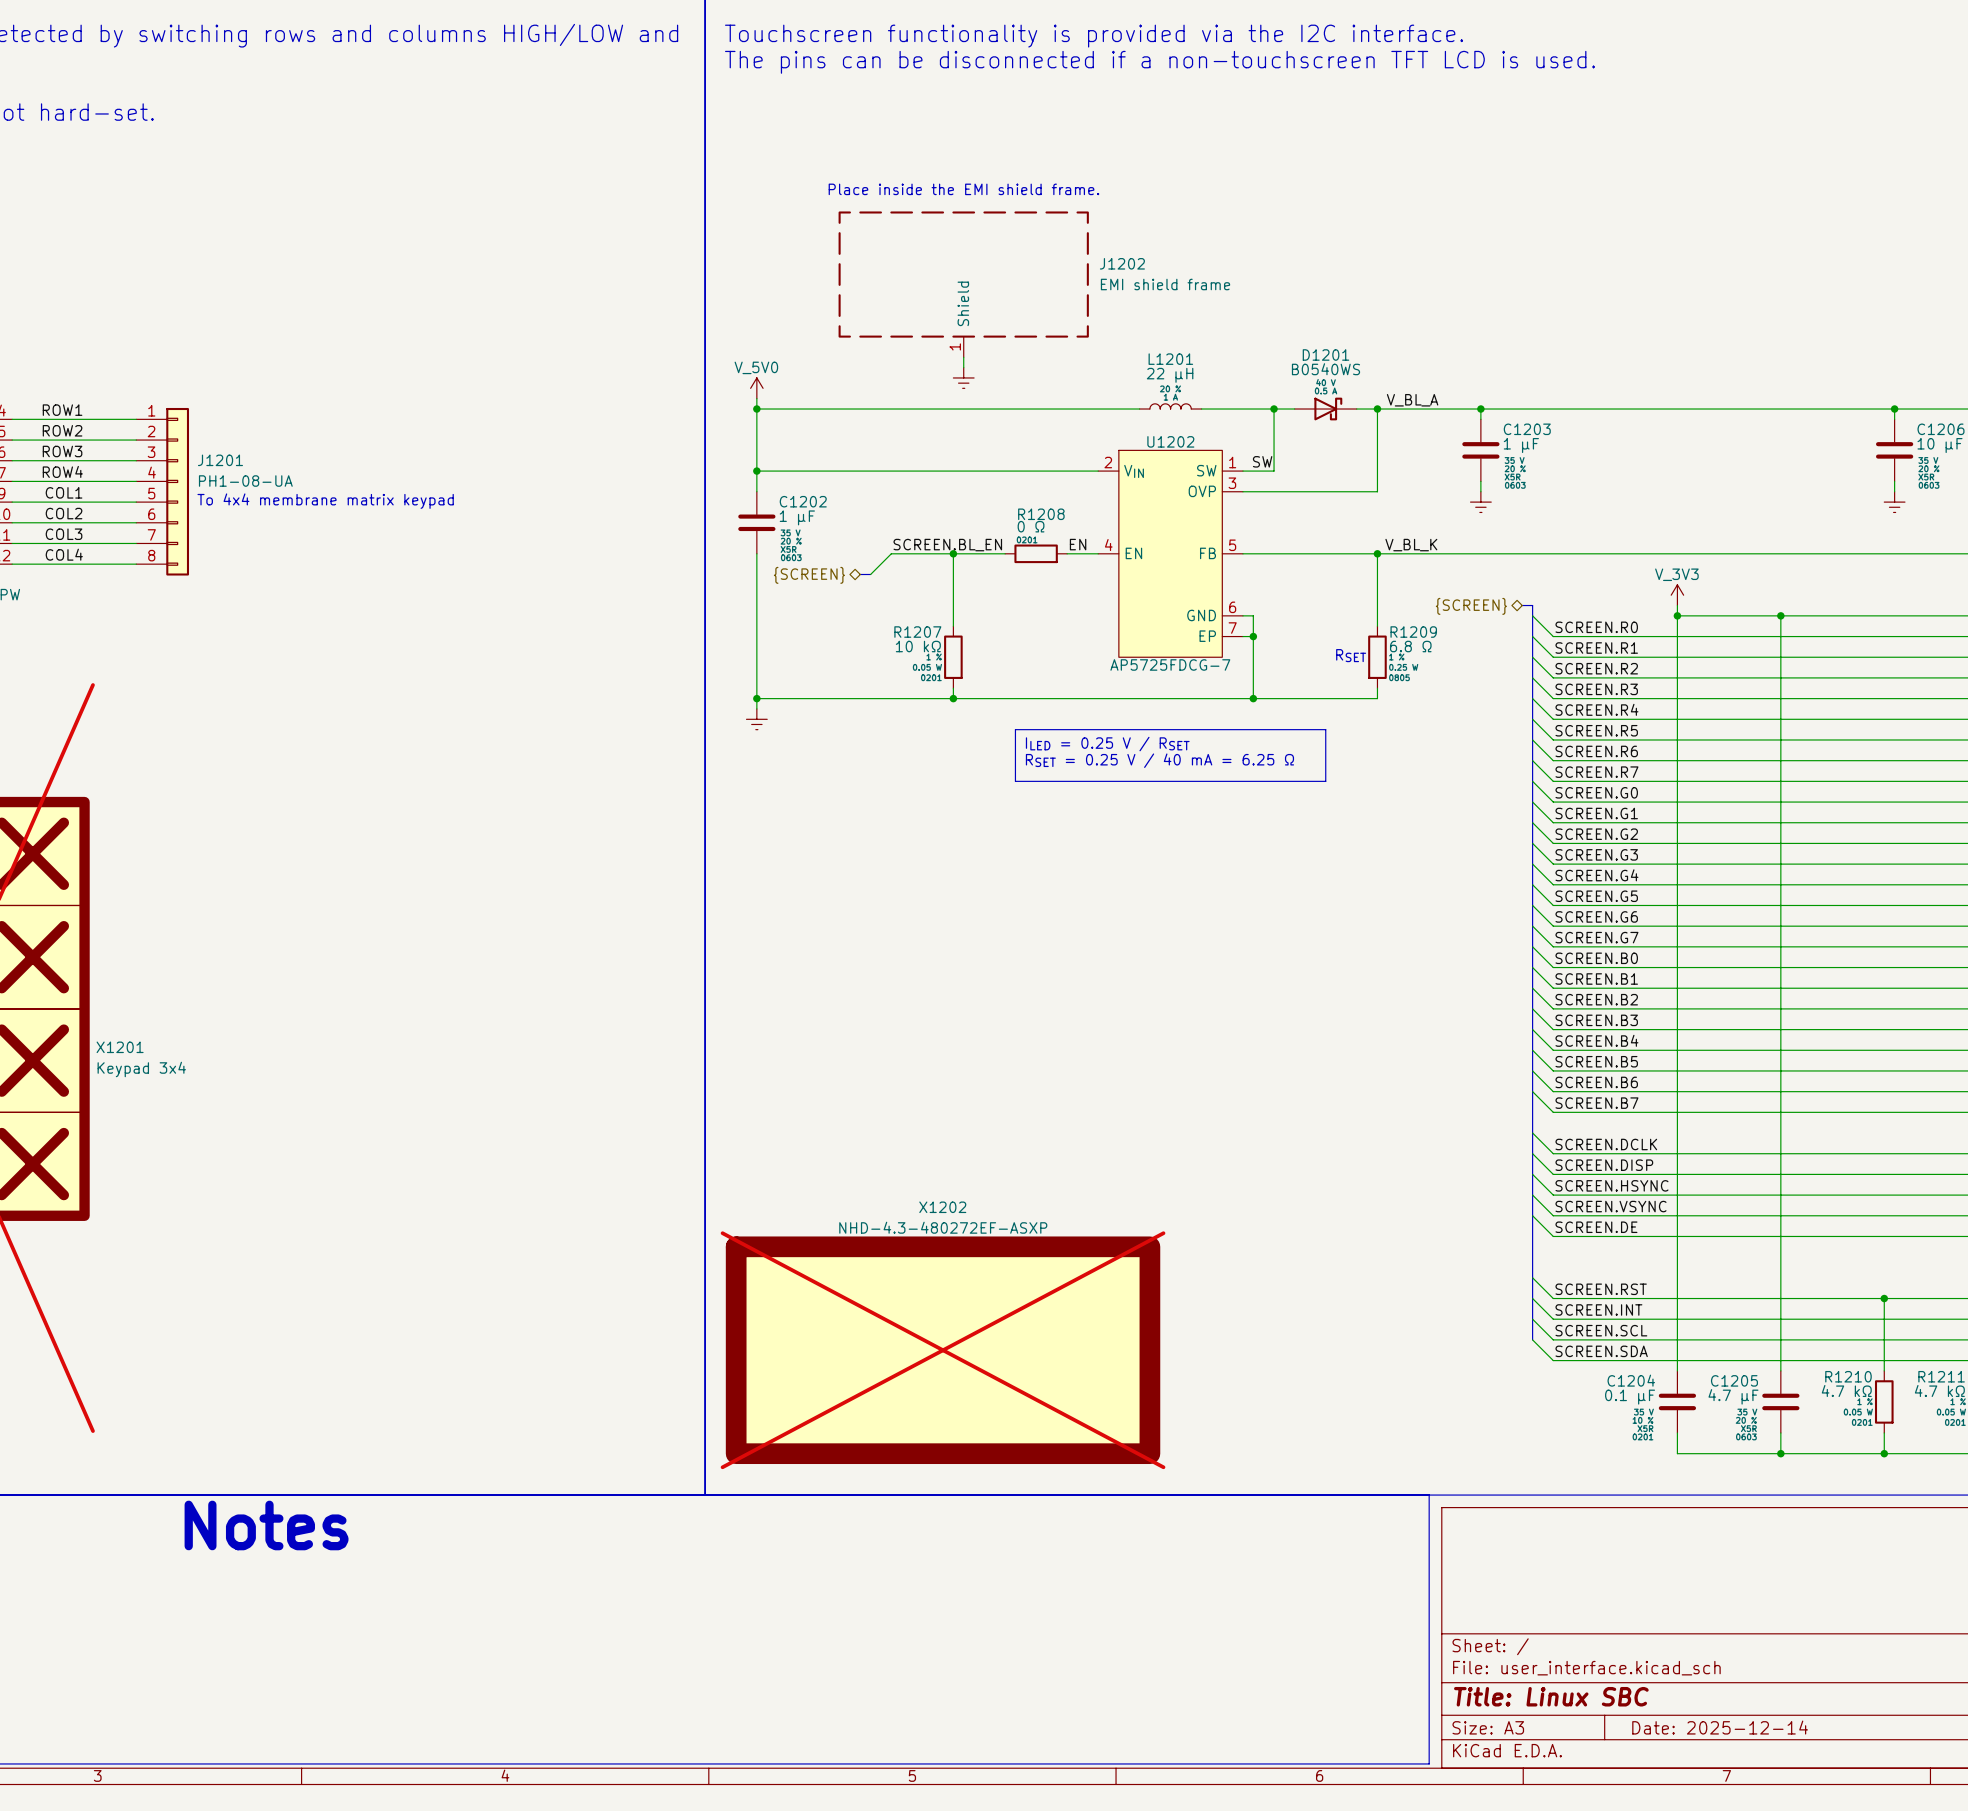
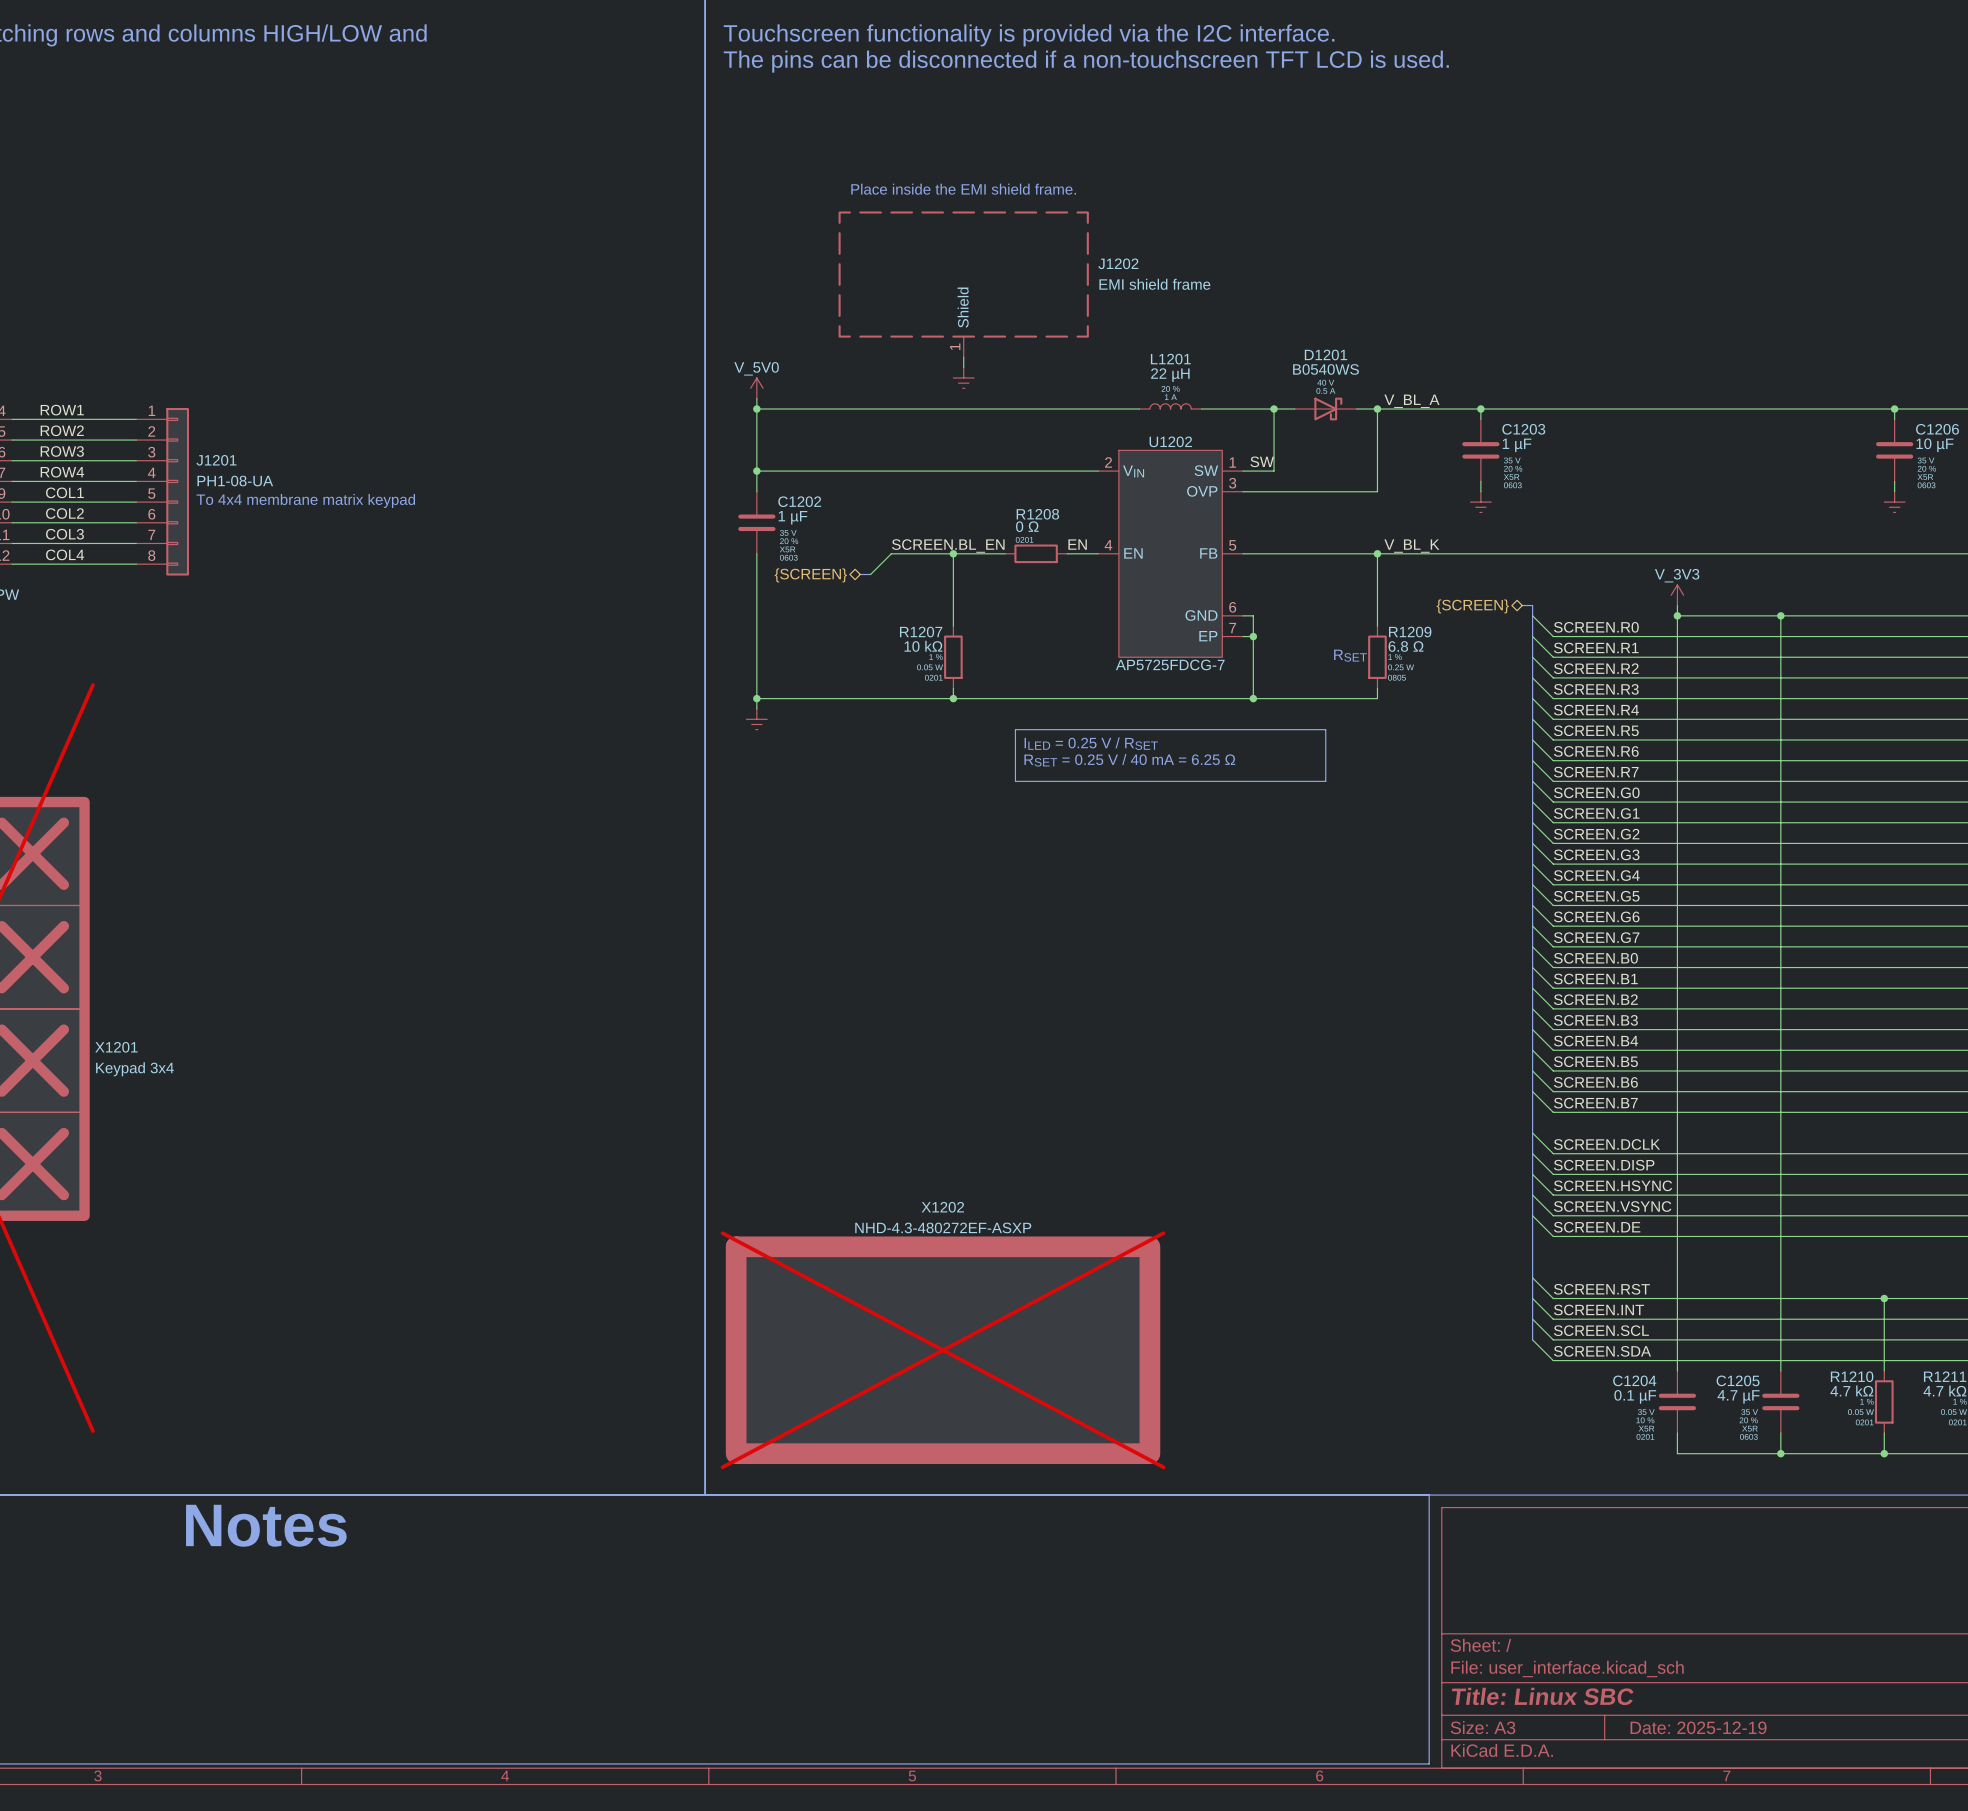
title block: Date: 2025-12-14 (1720, 1727) -> Date: 2025-12-19 (1698, 1727)

